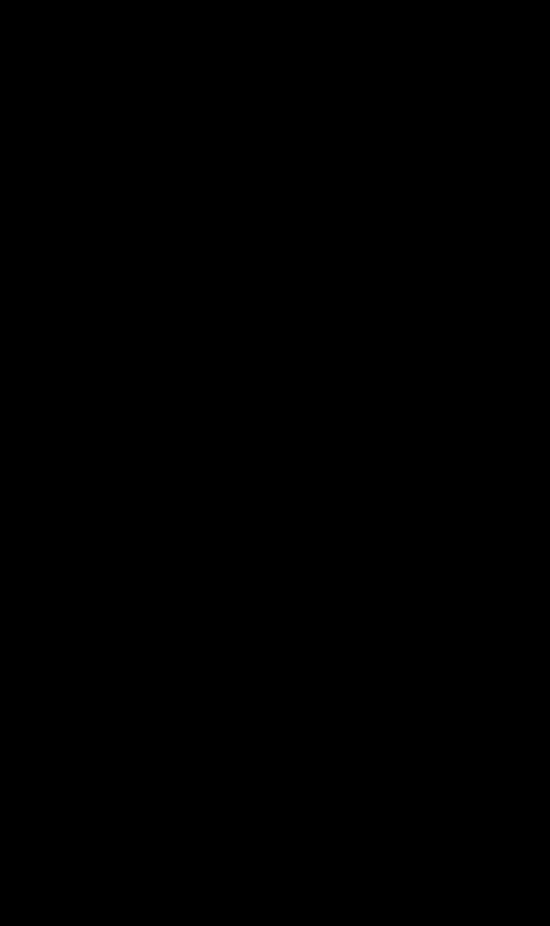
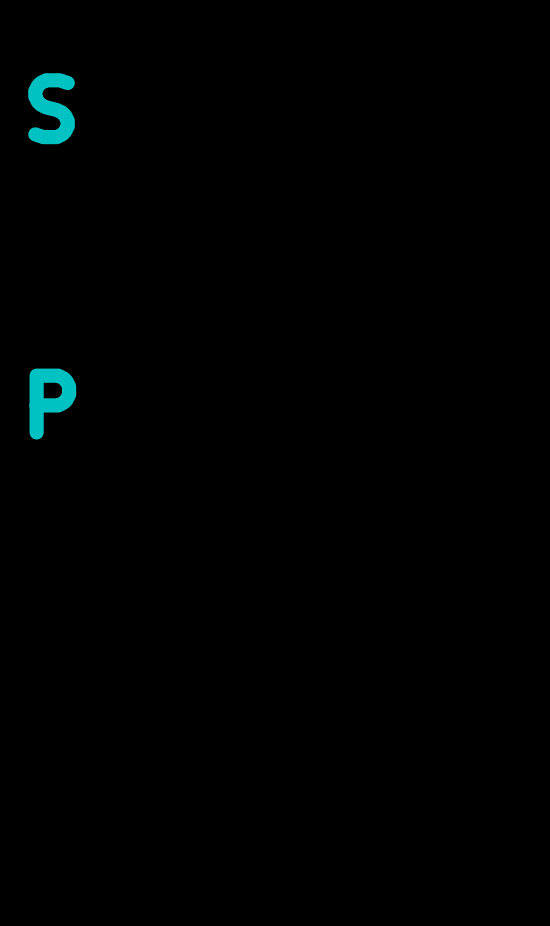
text: none -> S (51, 108)
text: none -> P (52, 404)

